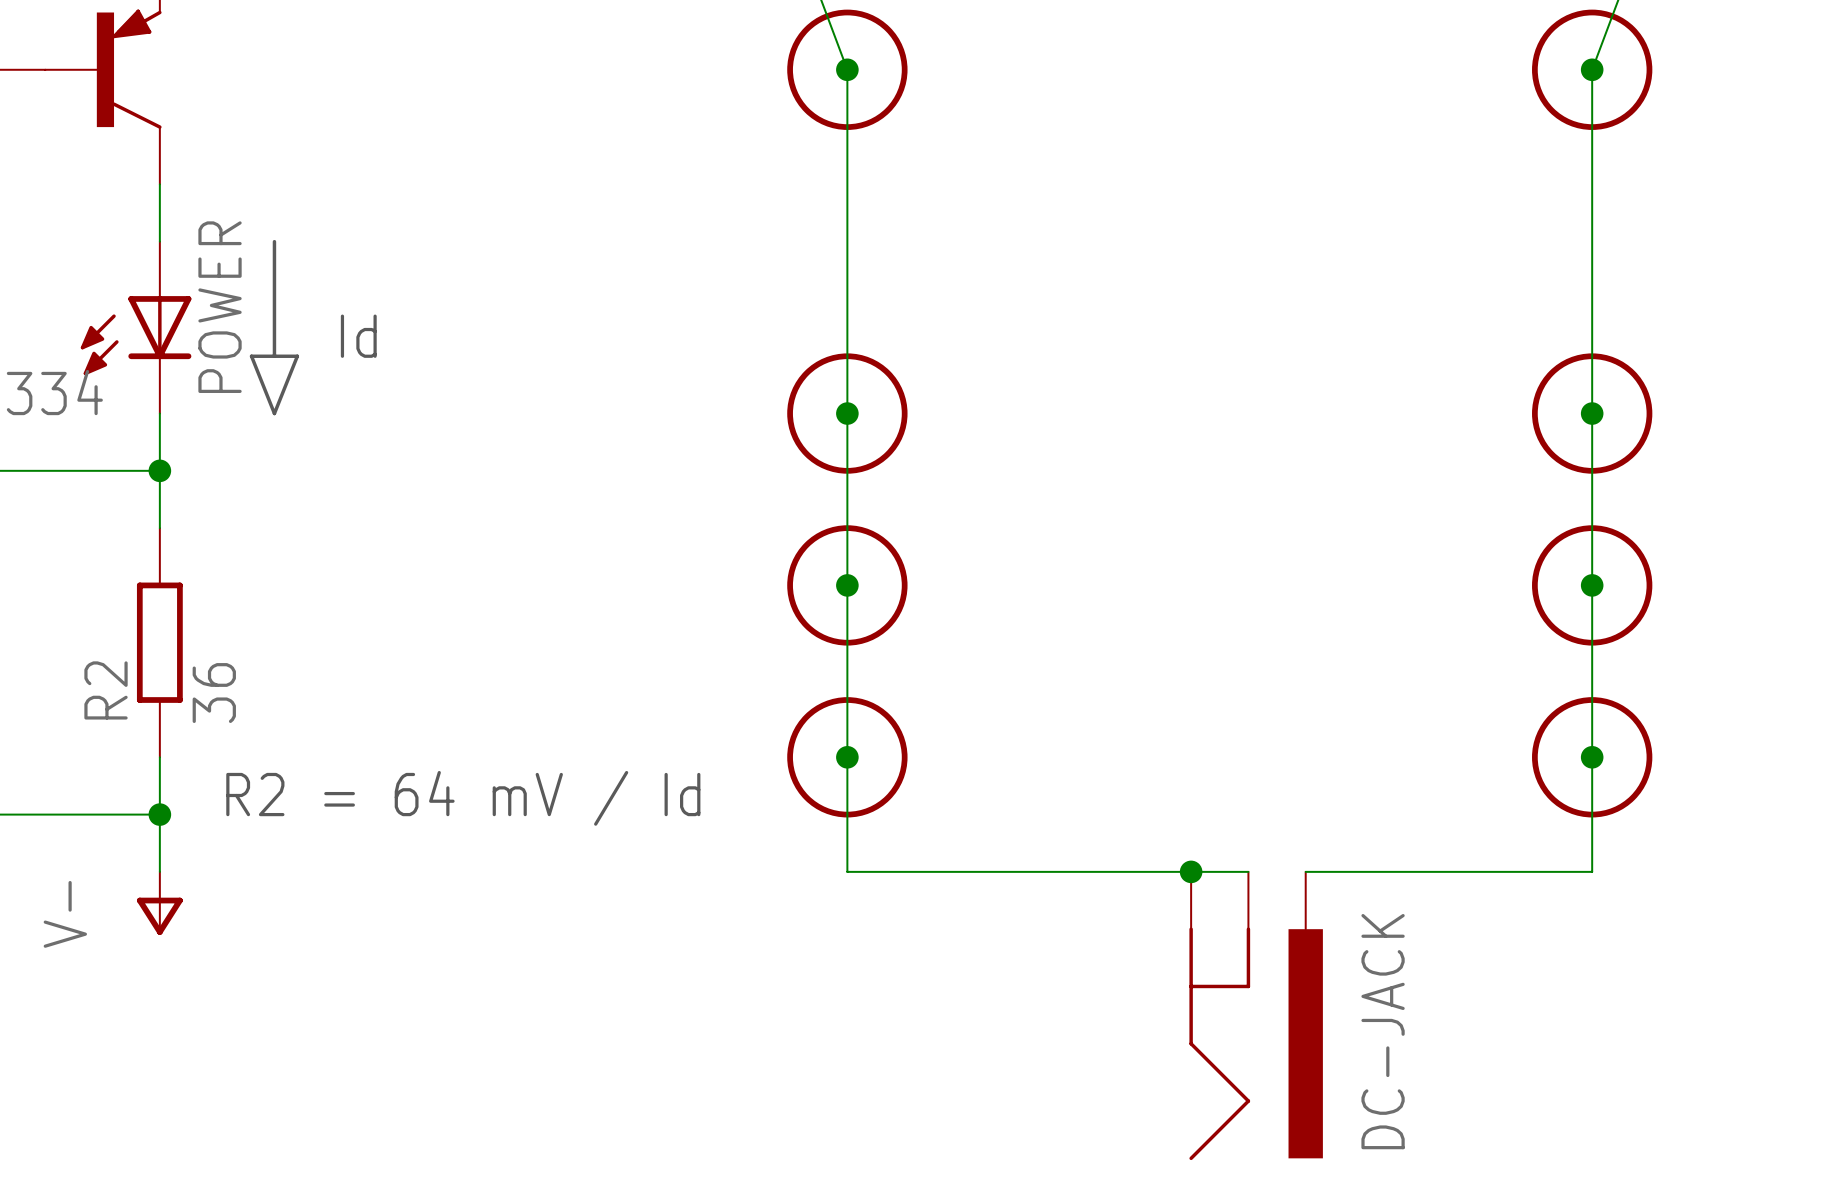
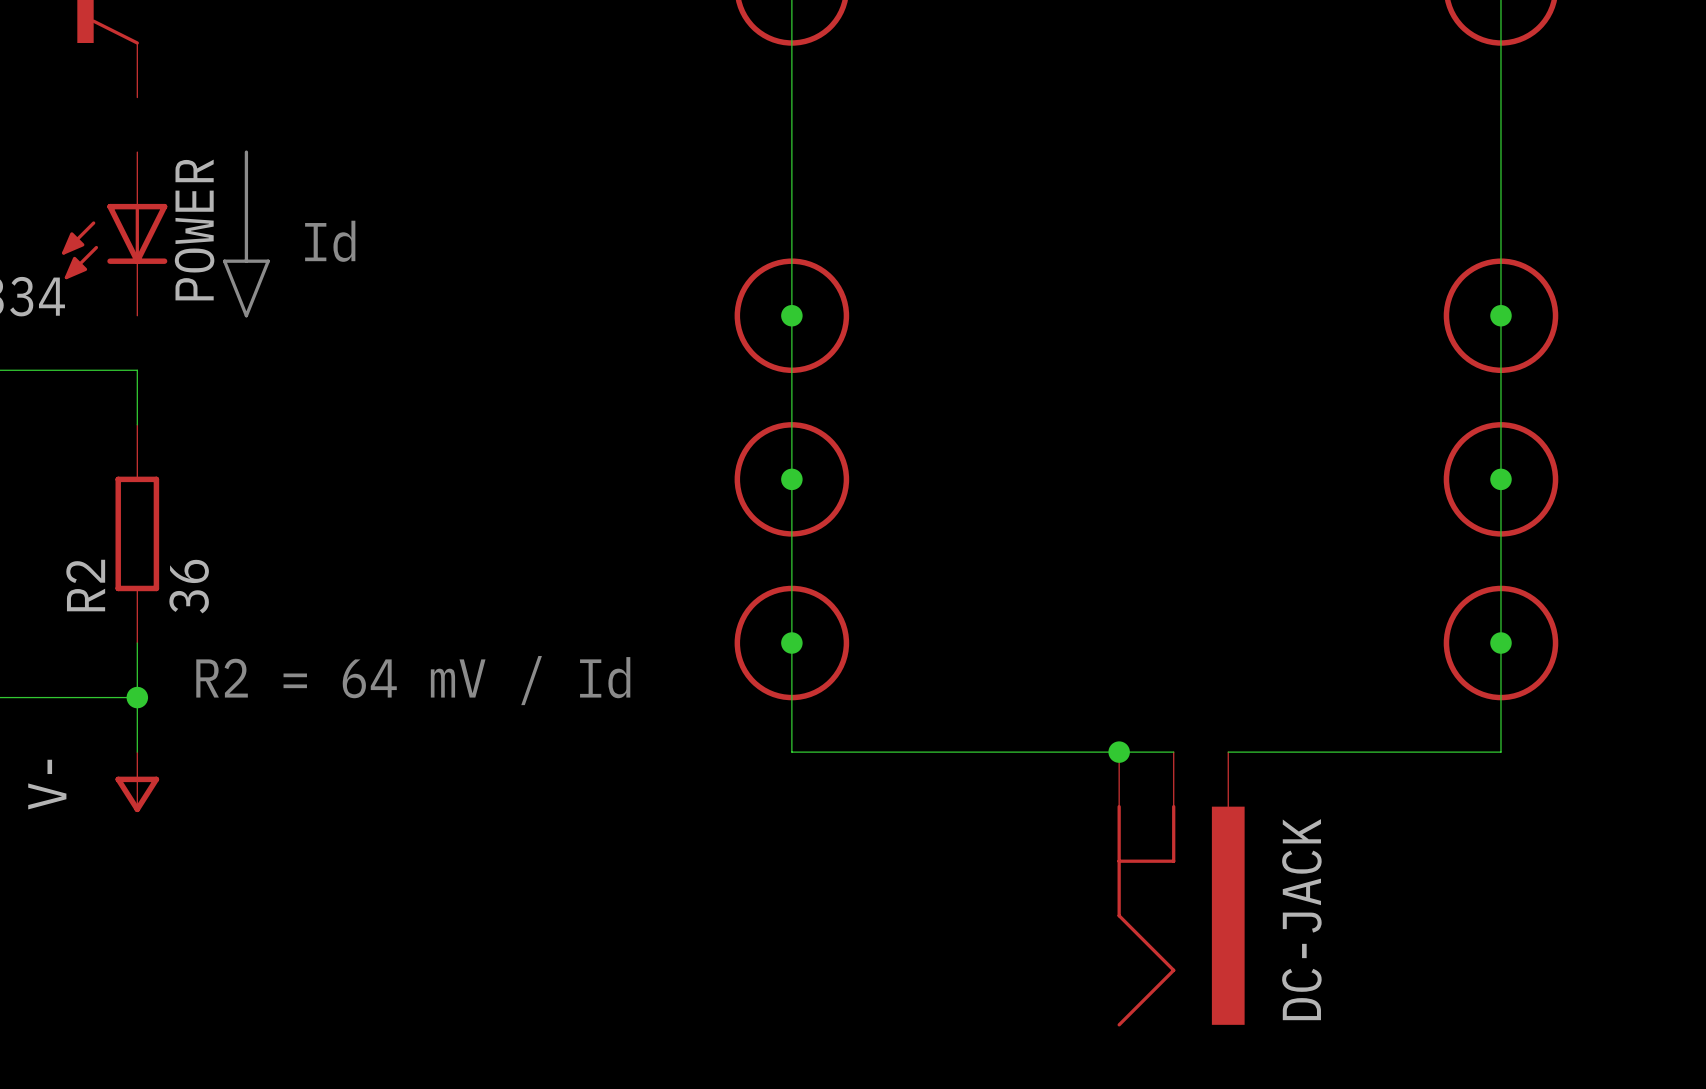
wire: (159, 184) (159, 241) -> none
wire: (159, 413) (159, 470) -> none
junction: (159, 470) -> none

